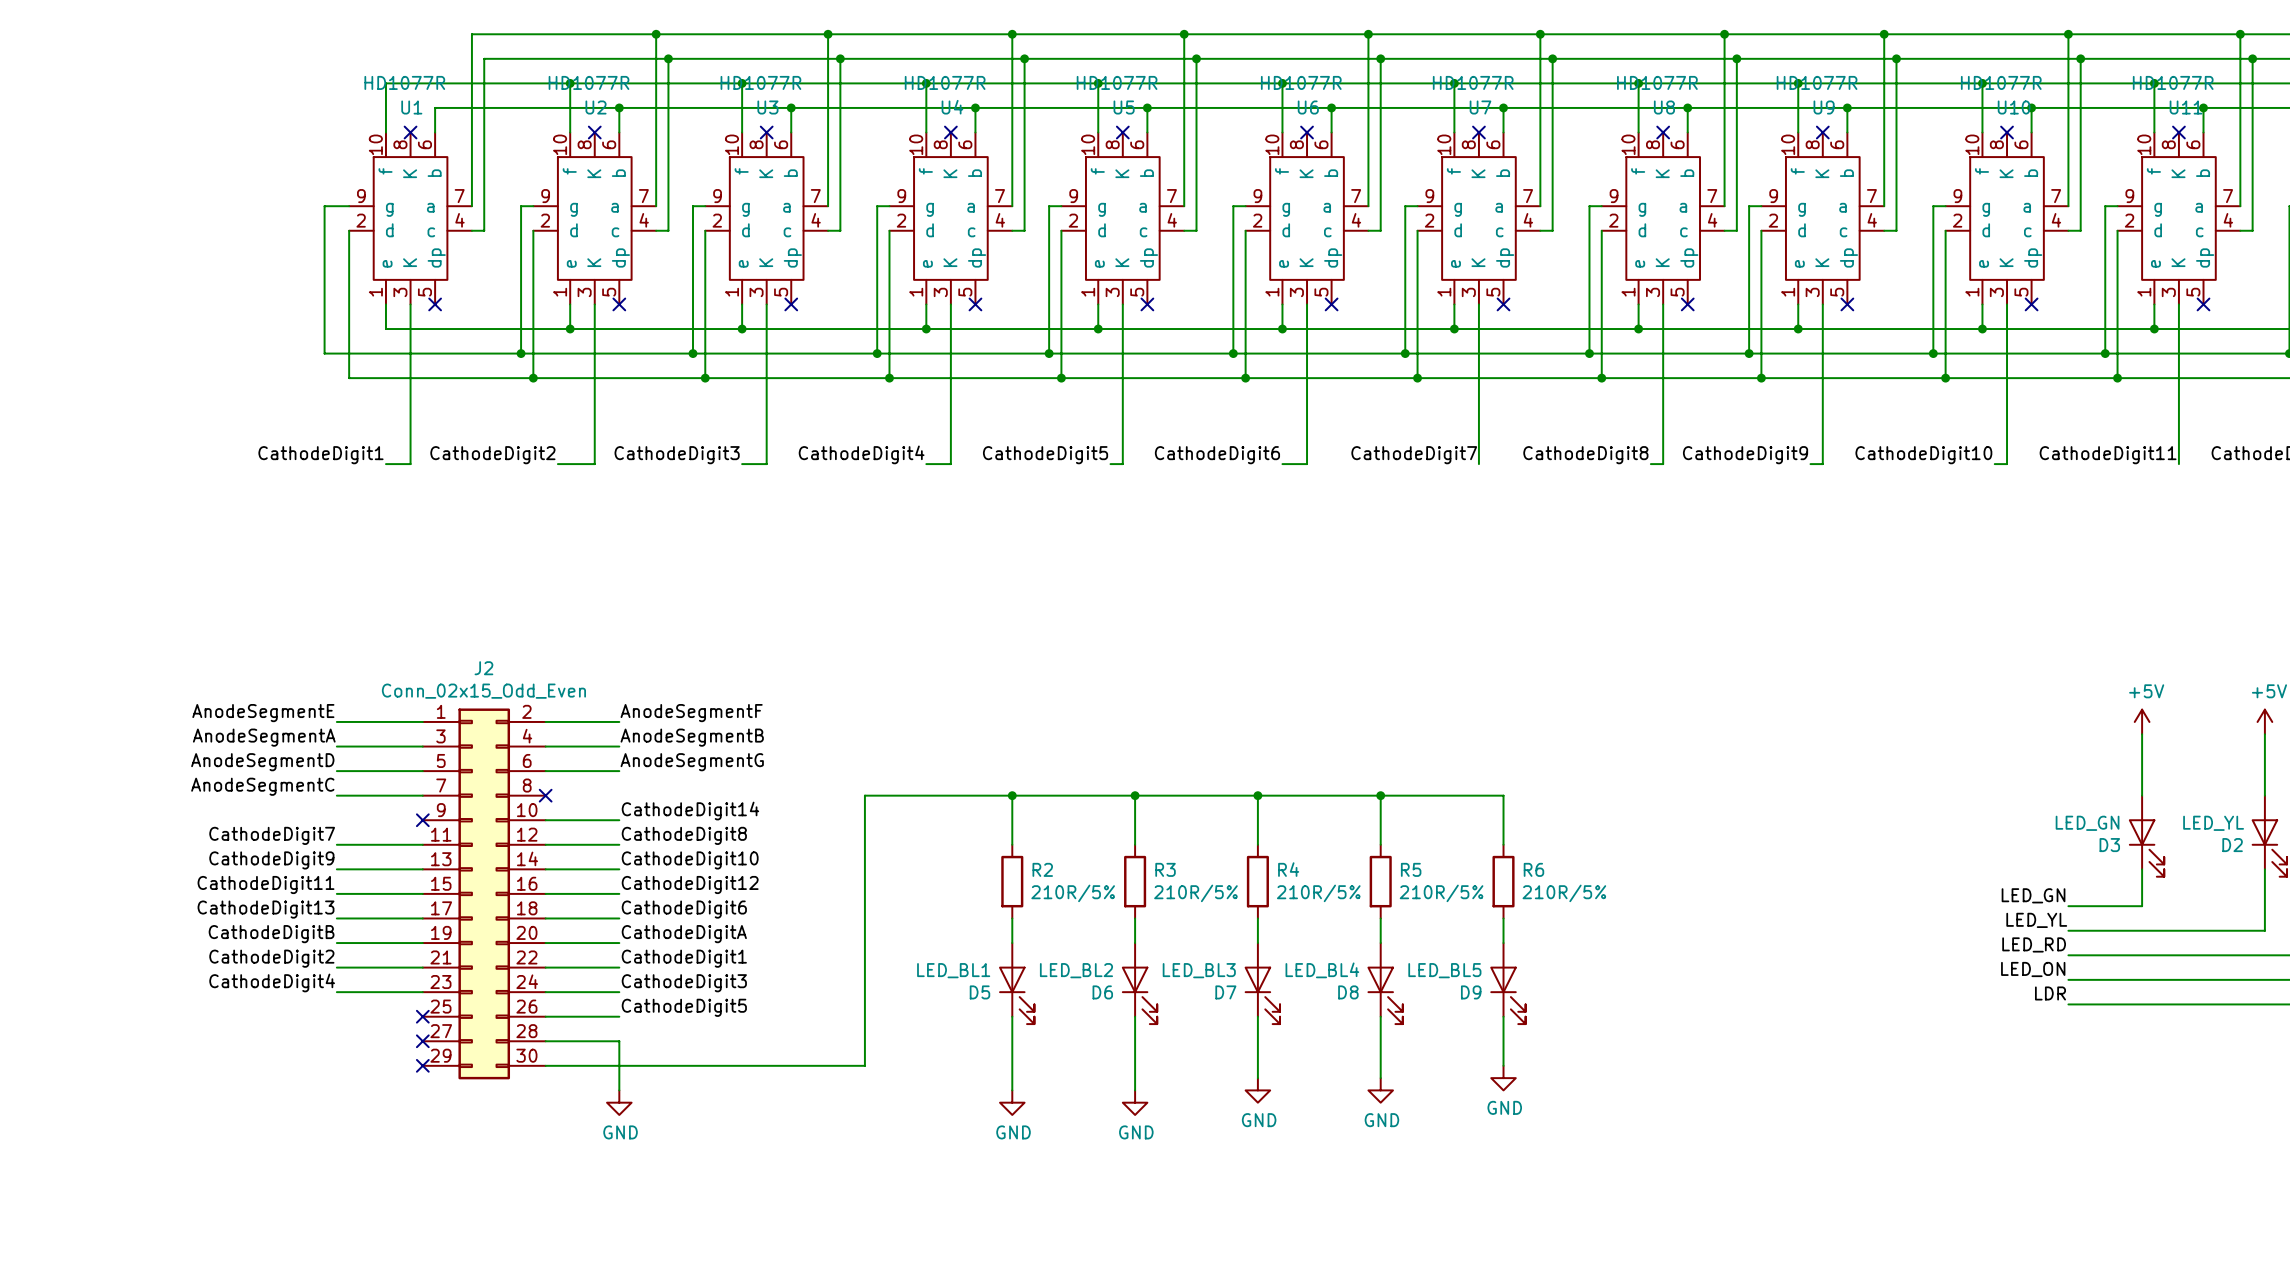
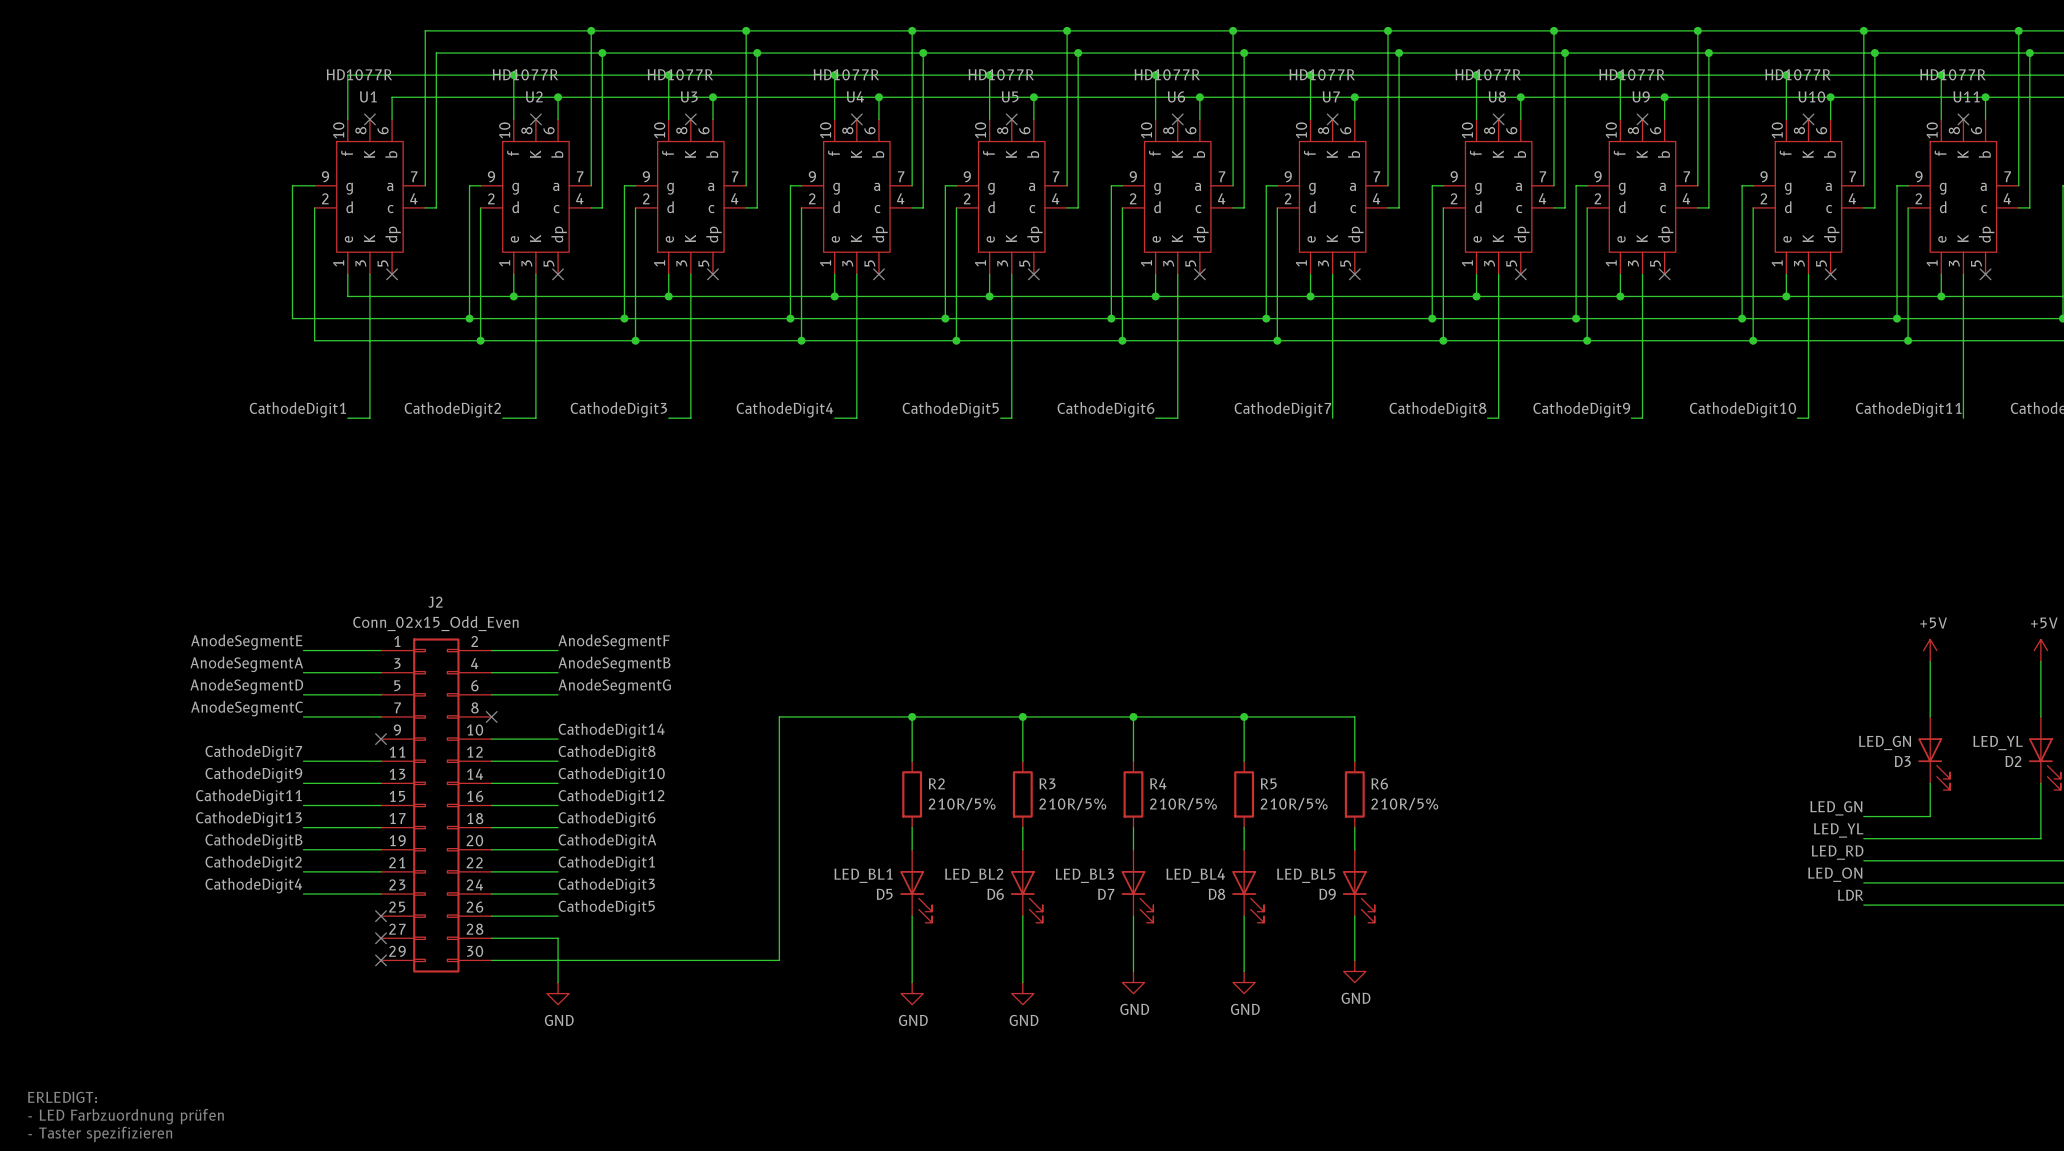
text: none -> ERLEDIGT: (62, 1097)
text: none -> - LED Farbzuordnung prüfen (126, 1116)
text: none -> - Taster spezifizieren (100, 1134)

